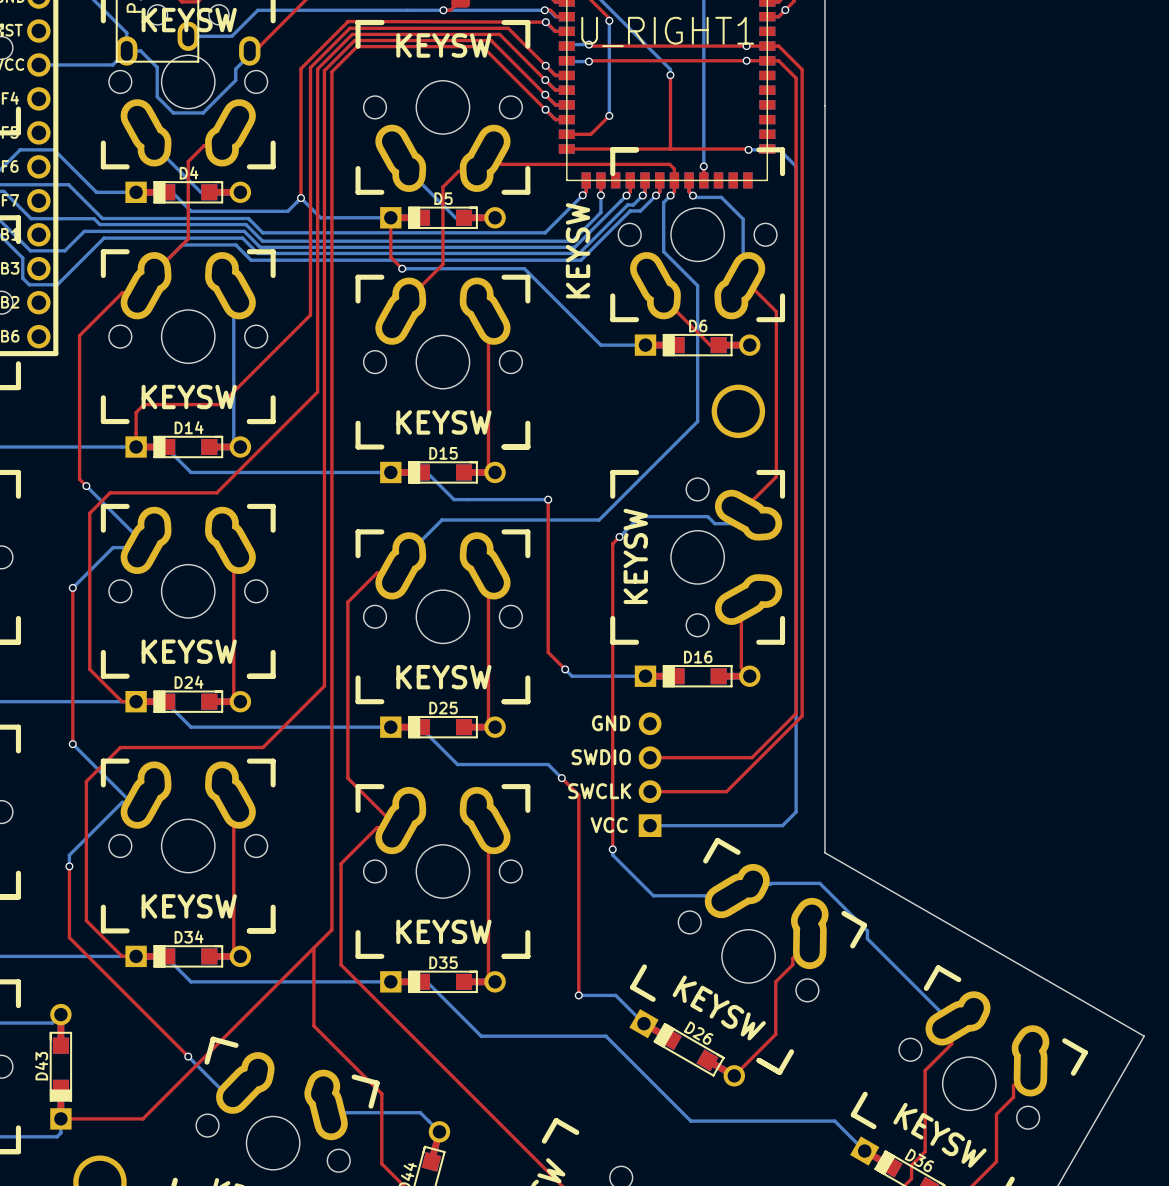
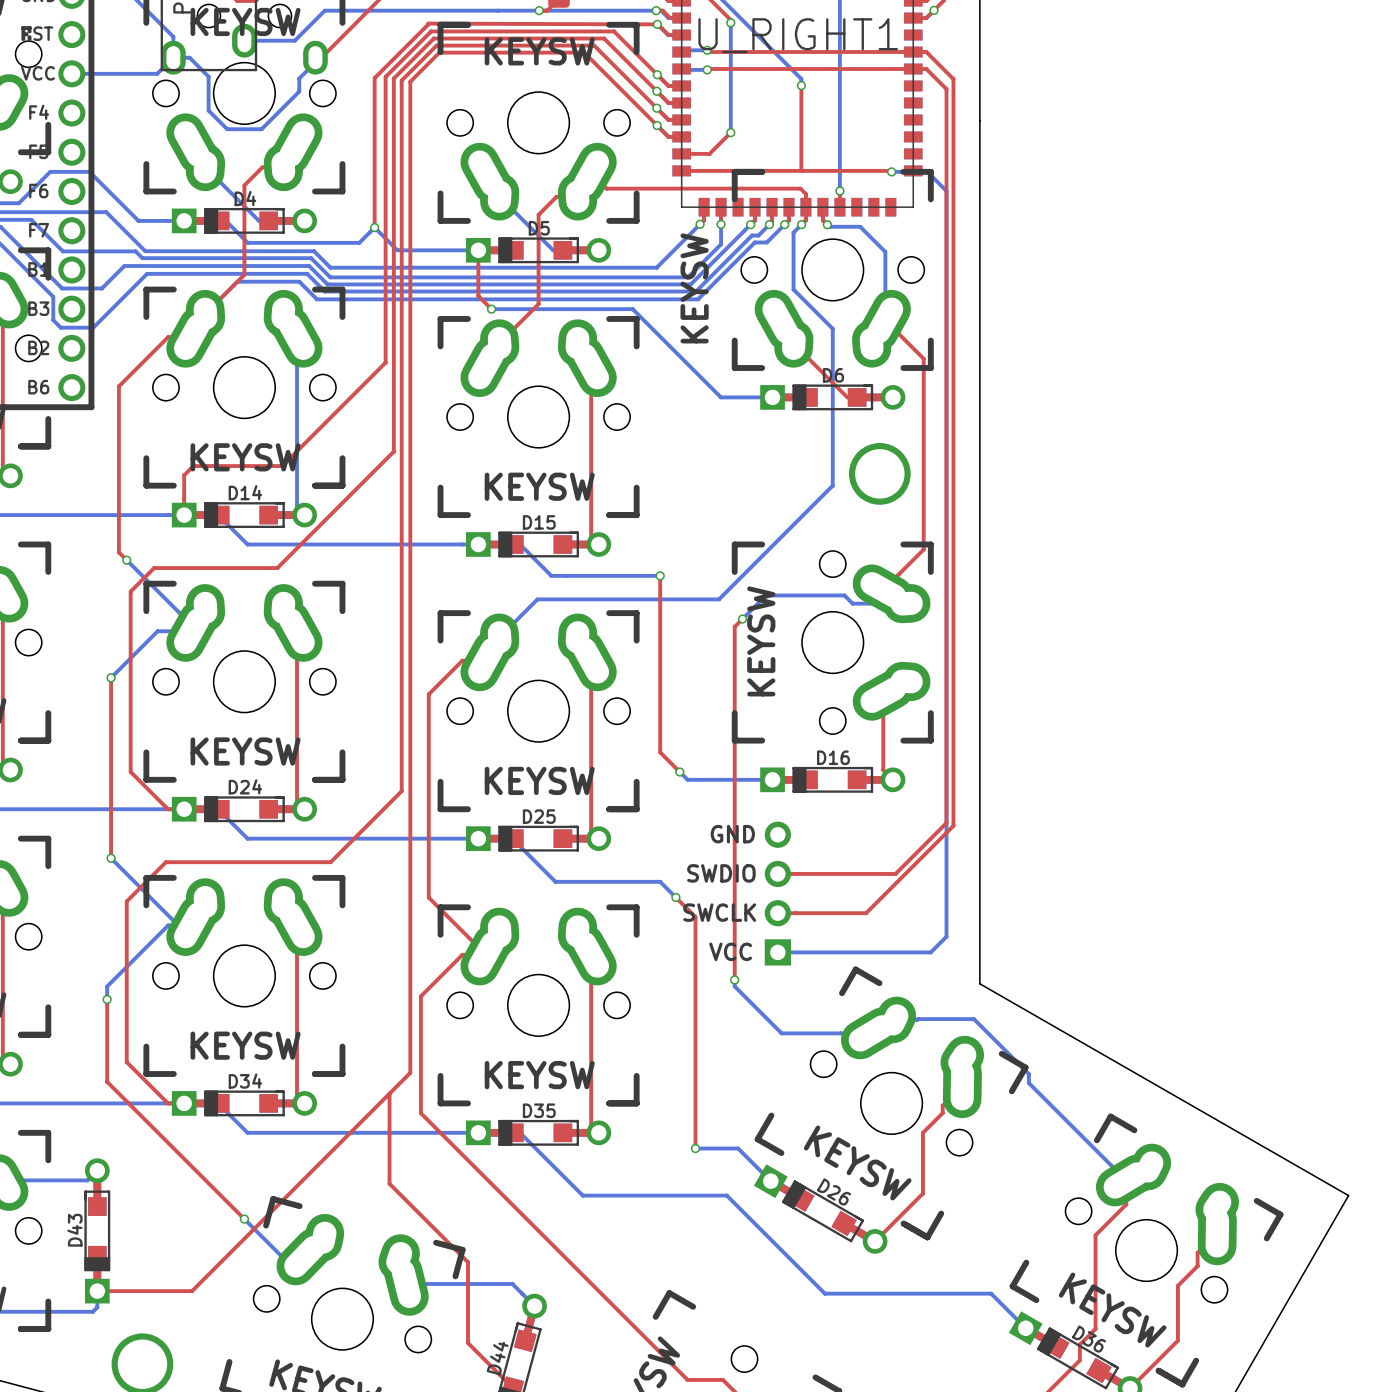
via: (746, 46) -> none
via: (746, 60) -> none

